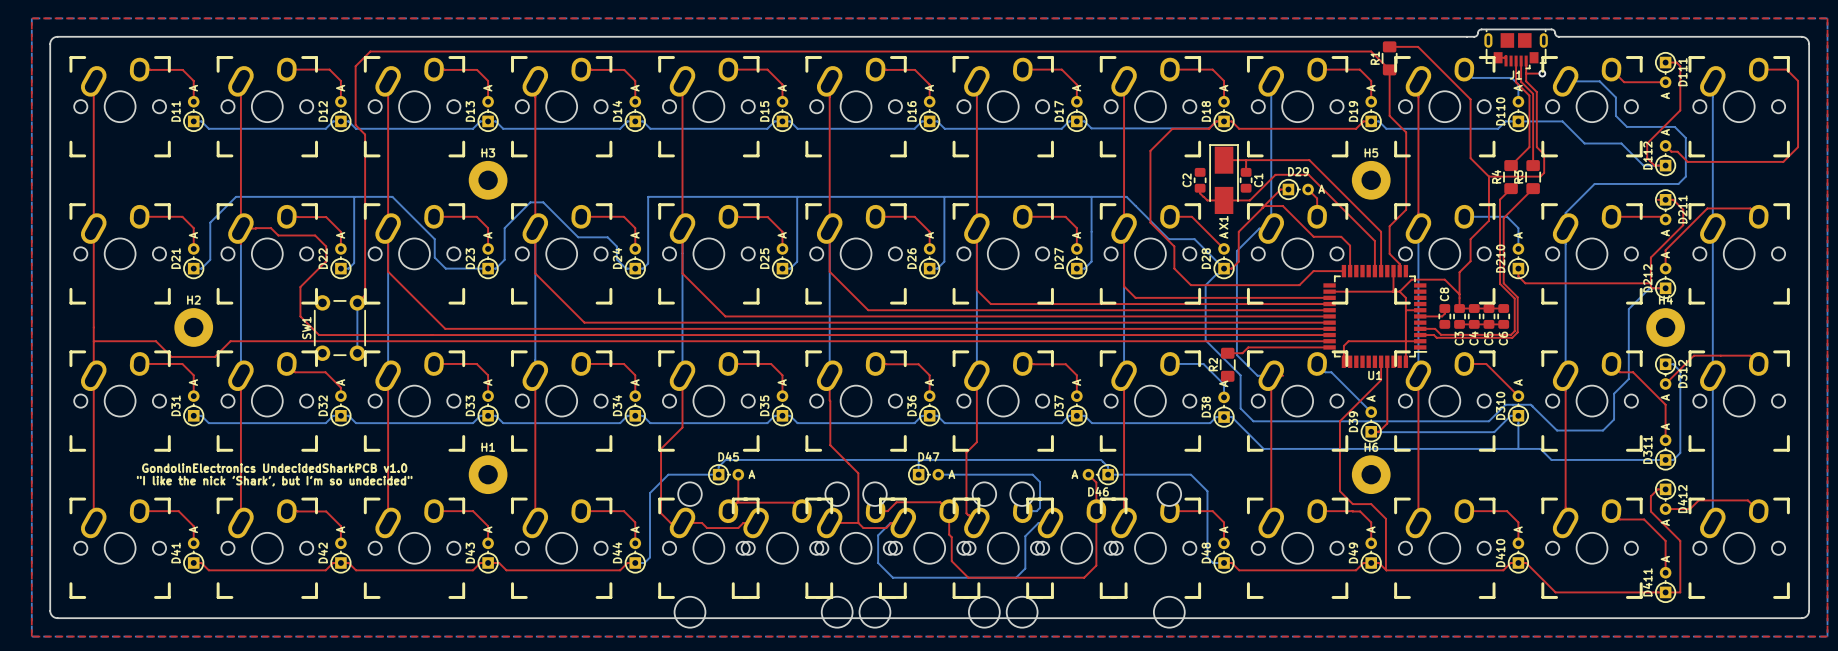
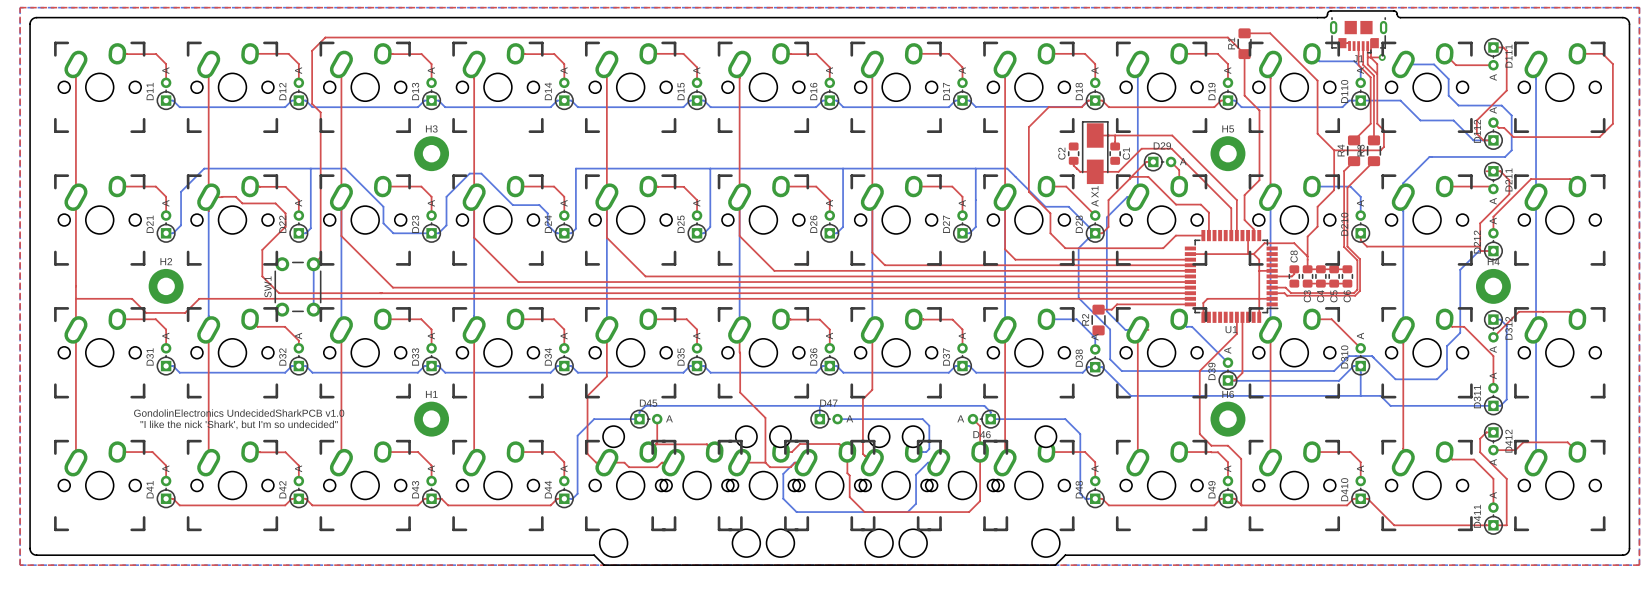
board edge: none -> (1622, 17) (1400, 17) (1394, 11) (1330, 10) (1324, 17) (36, 17) (32, 19) (30, 24)
board edge: none -> (1622, 17) (1627, 19) (1629, 24) (1629, 548) (1627, 553) (1622, 555) (1065, 555) (1055, 565) (604, 565) (594, 555) (33, 554) (30, 548) (30, 24)
board edge: (1477, 33) (1481, 29) (1551, 29) (1558, 36) (1801, 36) -> none
board edge: (1477, 33) (1474, 36) (54, 37) (50, 44) (50, 613) (57, 618) (1801, 618) (1806, 616) (1809, 610) -> none
board edge: (1801, 36) (1806, 38) (1809, 44) (1809, 610) -> none
top track: none -> (1371, 39) (1371, 57) (1377, 64) (1377, 74)

